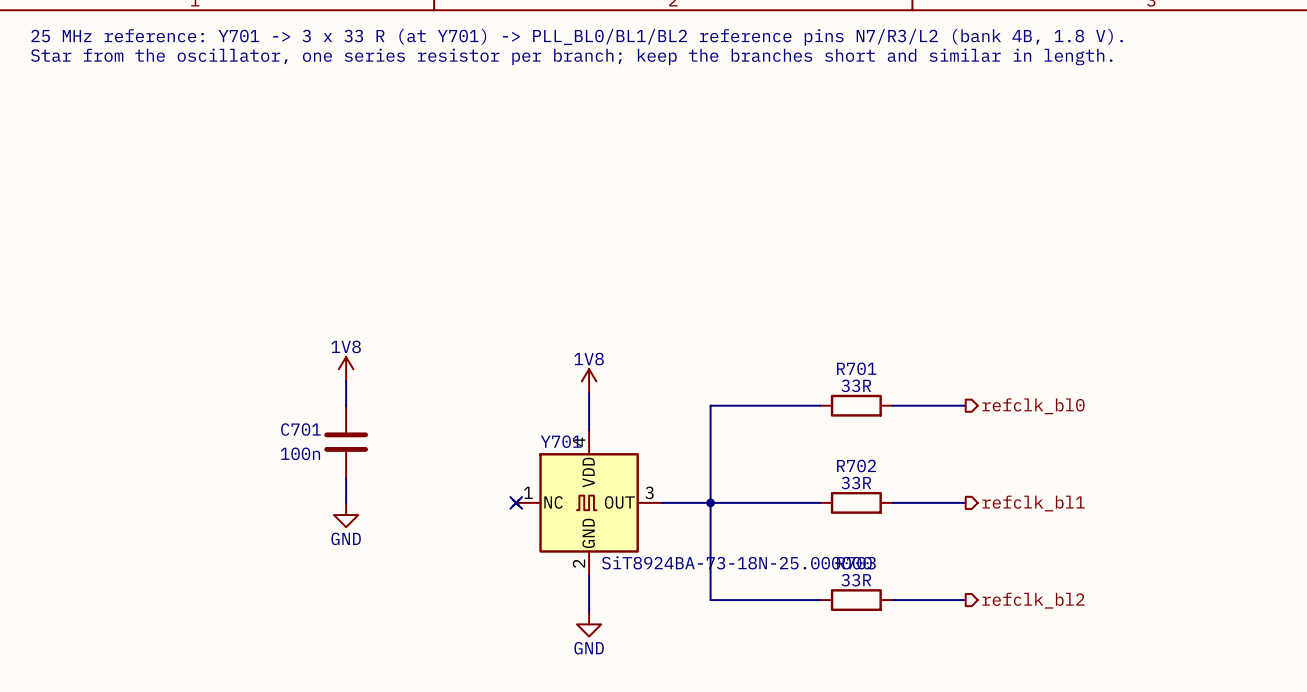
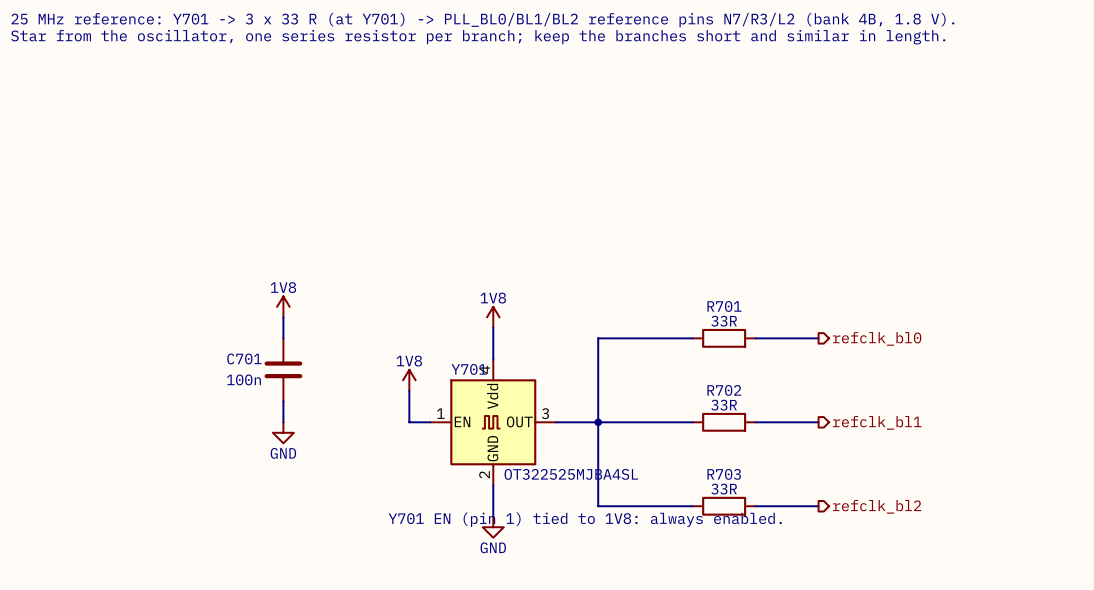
Y701 symbol: [513, 430, 662, 576] -> [430, 359, 557, 486]
power symbol: none -> 1V8 (409, 380)
wire: none -> (409, 390) (409, 422) (430, 422)
no-connect mark: (516, 502) -> none
Y701 value: SiT8924BA-73-18N-25.000000 (736, 562) -> OT322525MJBA4SL (571, 474)
text: none -> Y701 EN (pin 1) tied to 1V8: always enabled. (585, 519)

